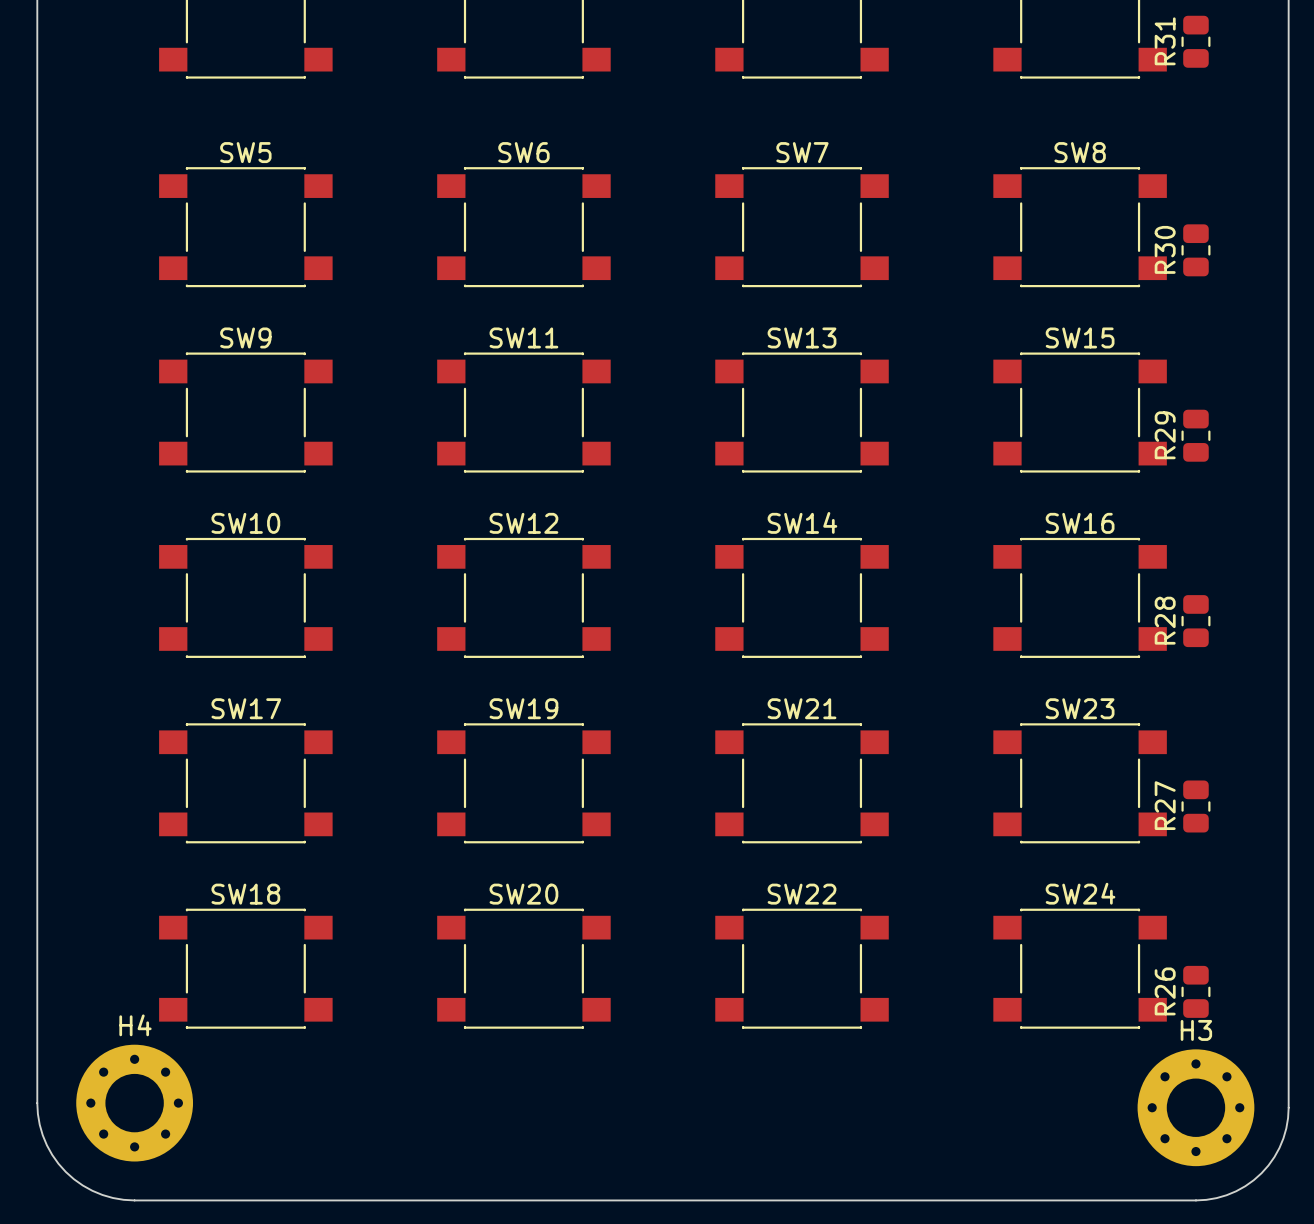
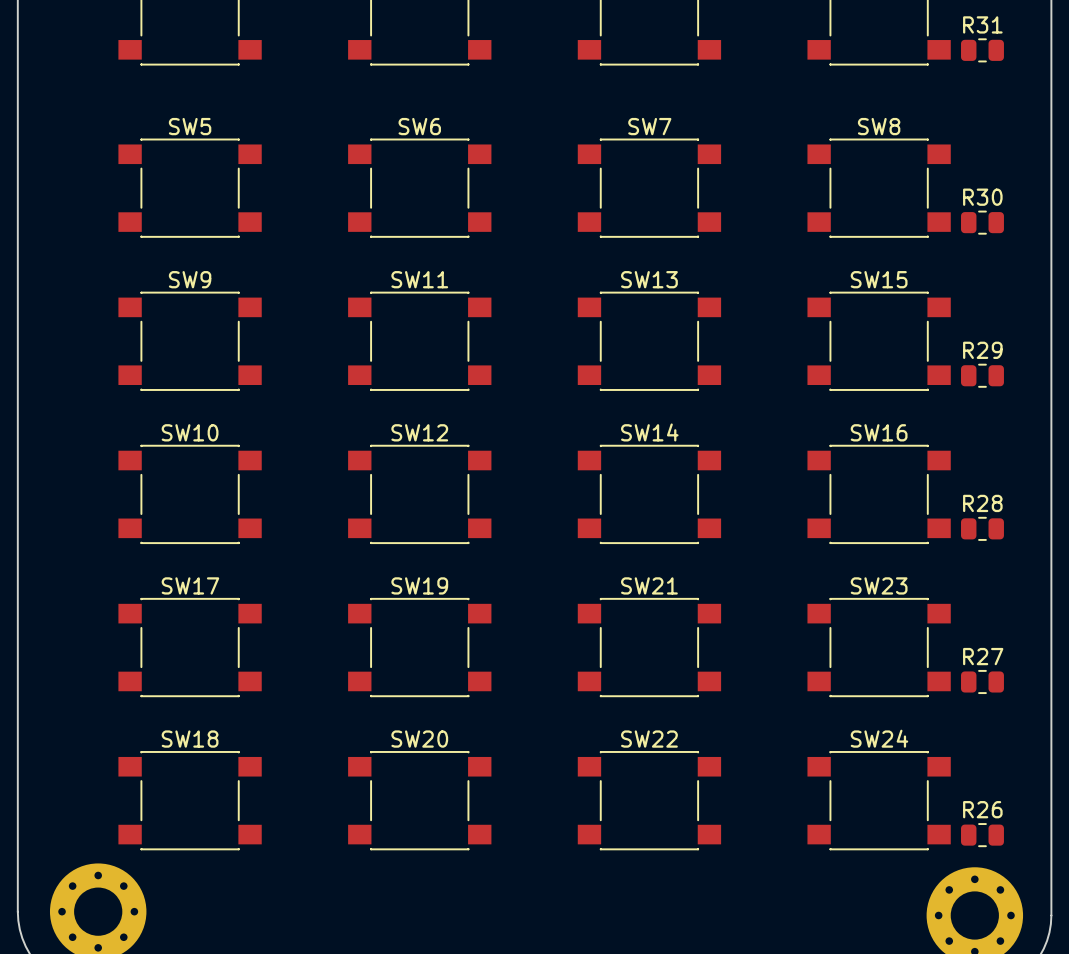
R31 rotation: 0° (1195, 41) -> 90° clockwise (982, 50)
R30 rotation: 0° (1195, 250) -> 90° clockwise (982, 222)
R29 rotation: 0° (1195, 435) -> 90° clockwise (982, 375)
R28 rotation: 0° (1195, 621) -> 90° clockwise (982, 528)
R27 rotation: 0° (1195, 806) -> 90° clockwise (982, 681)
R26 rotation: 0° (1195, 991) -> 90° clockwise (982, 835)
H4 name: H4 (135, 1025) -> none
H3 name: H3 (1196, 1030) -> none

